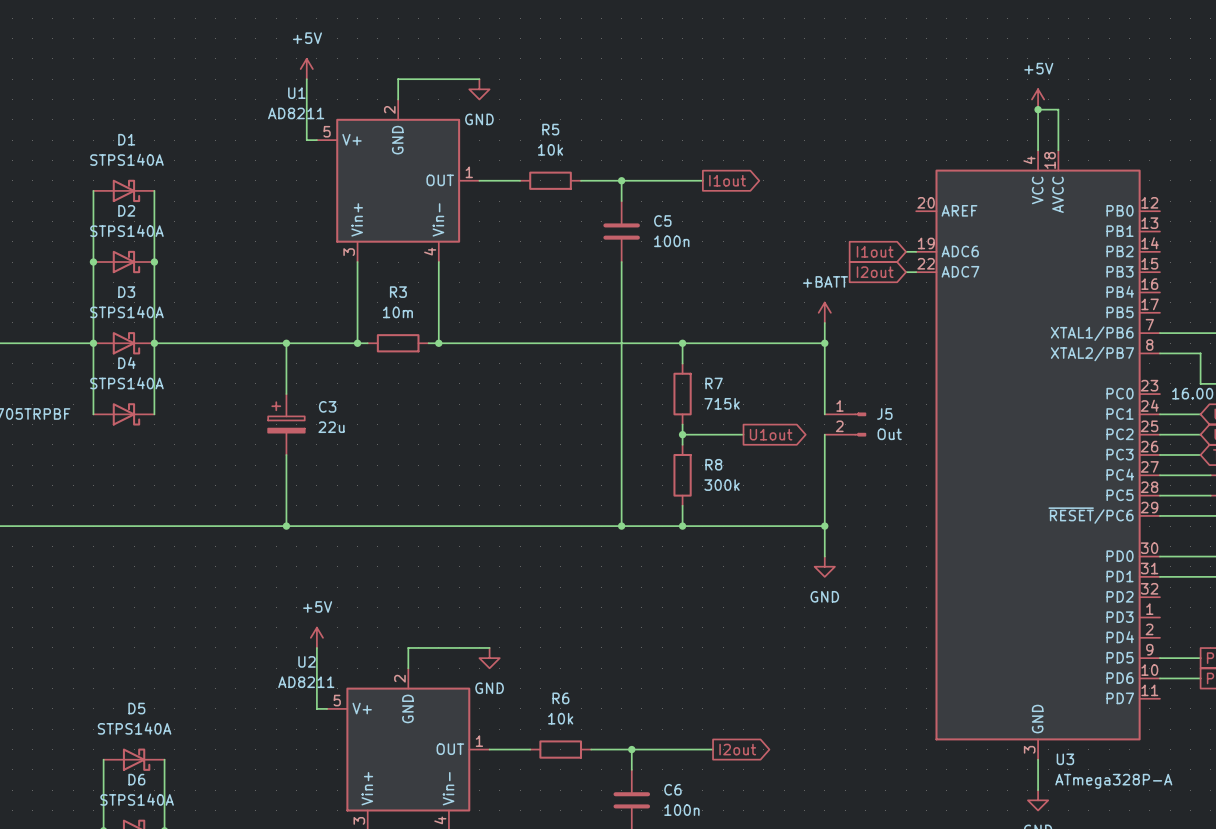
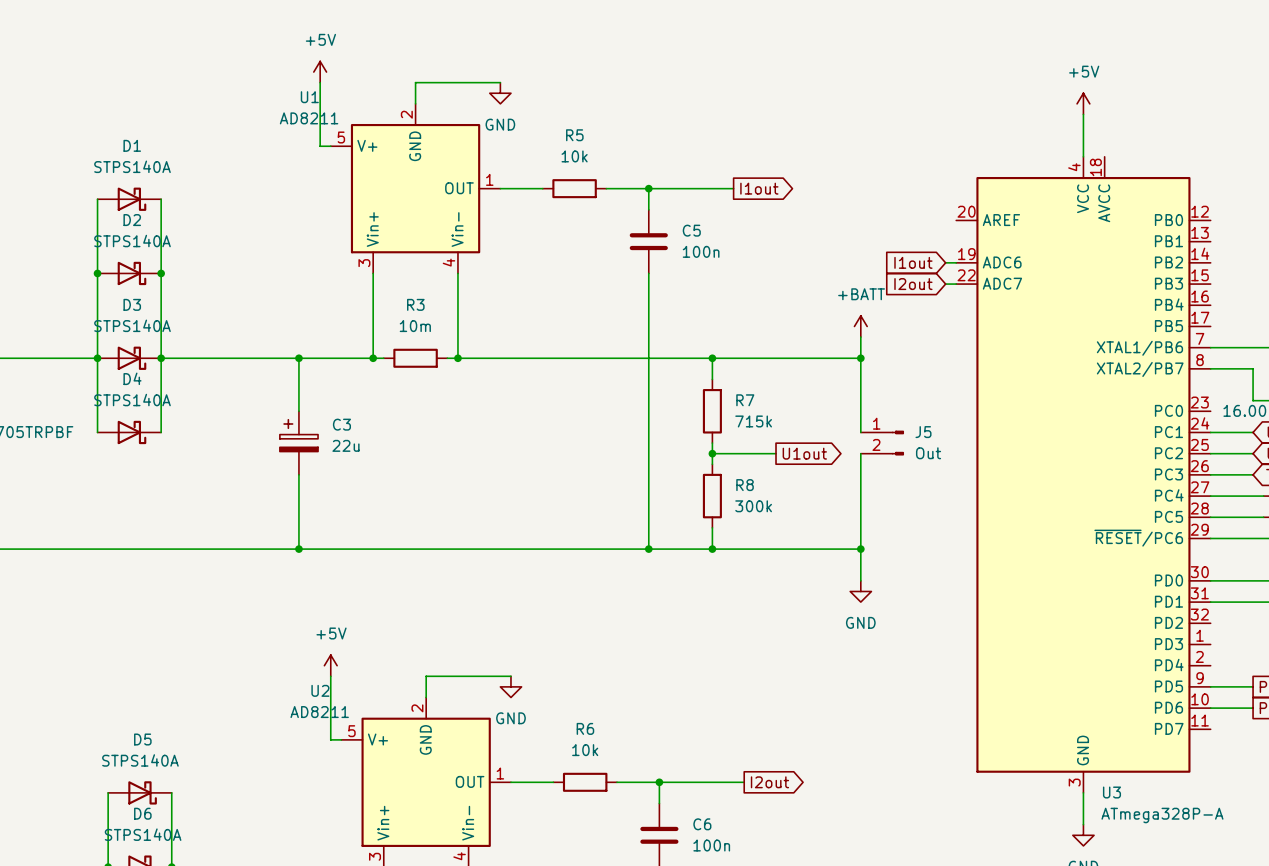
wire: (1038, 109) (1058, 109) (1058, 150) -> none
junction: (1038, 109) -> none

